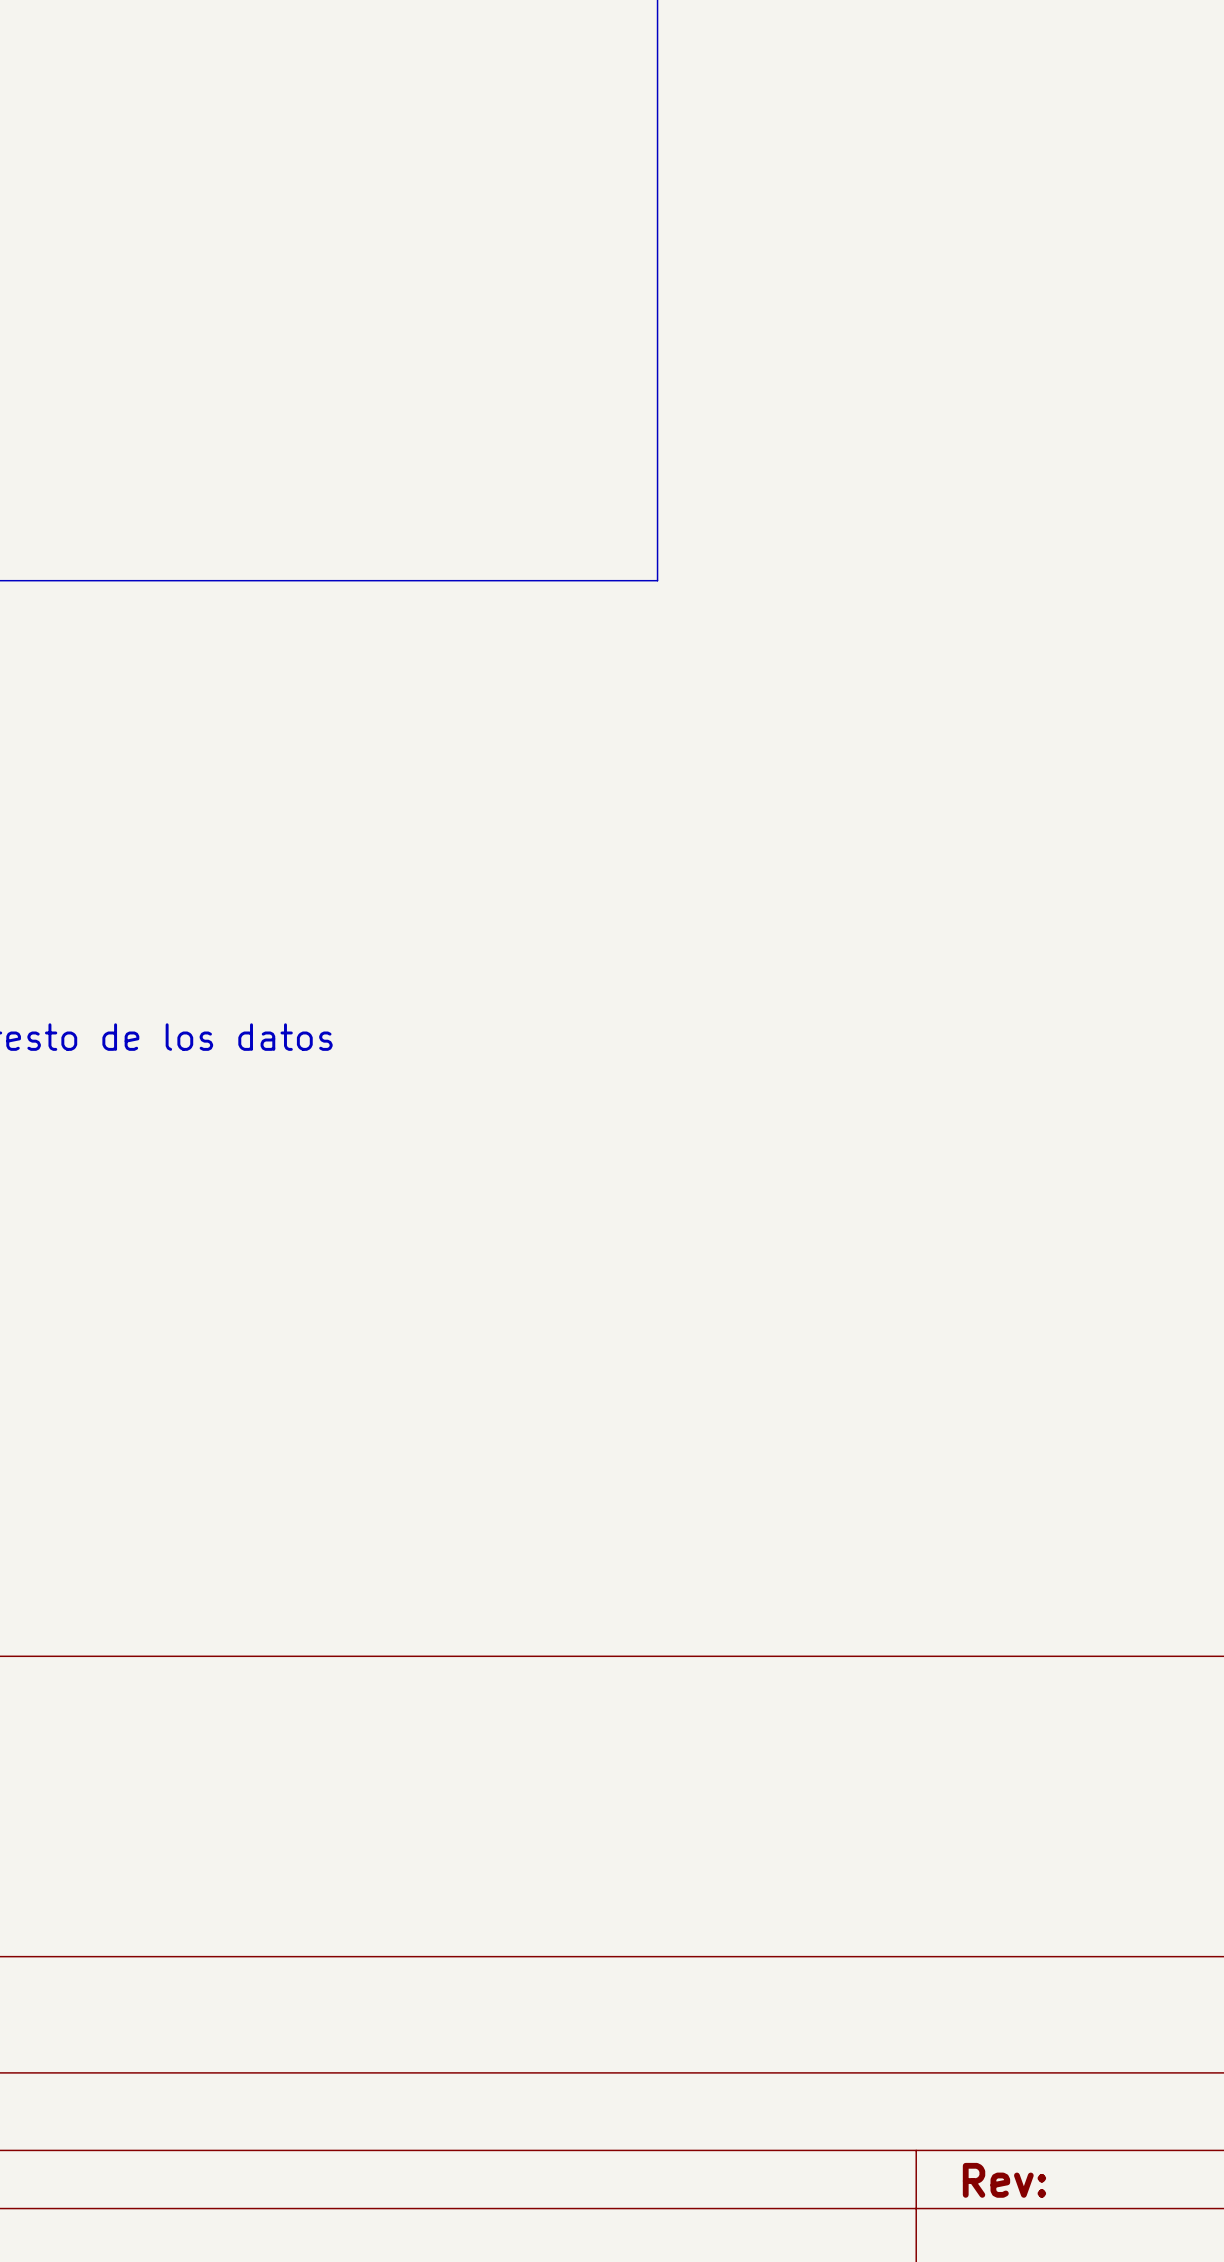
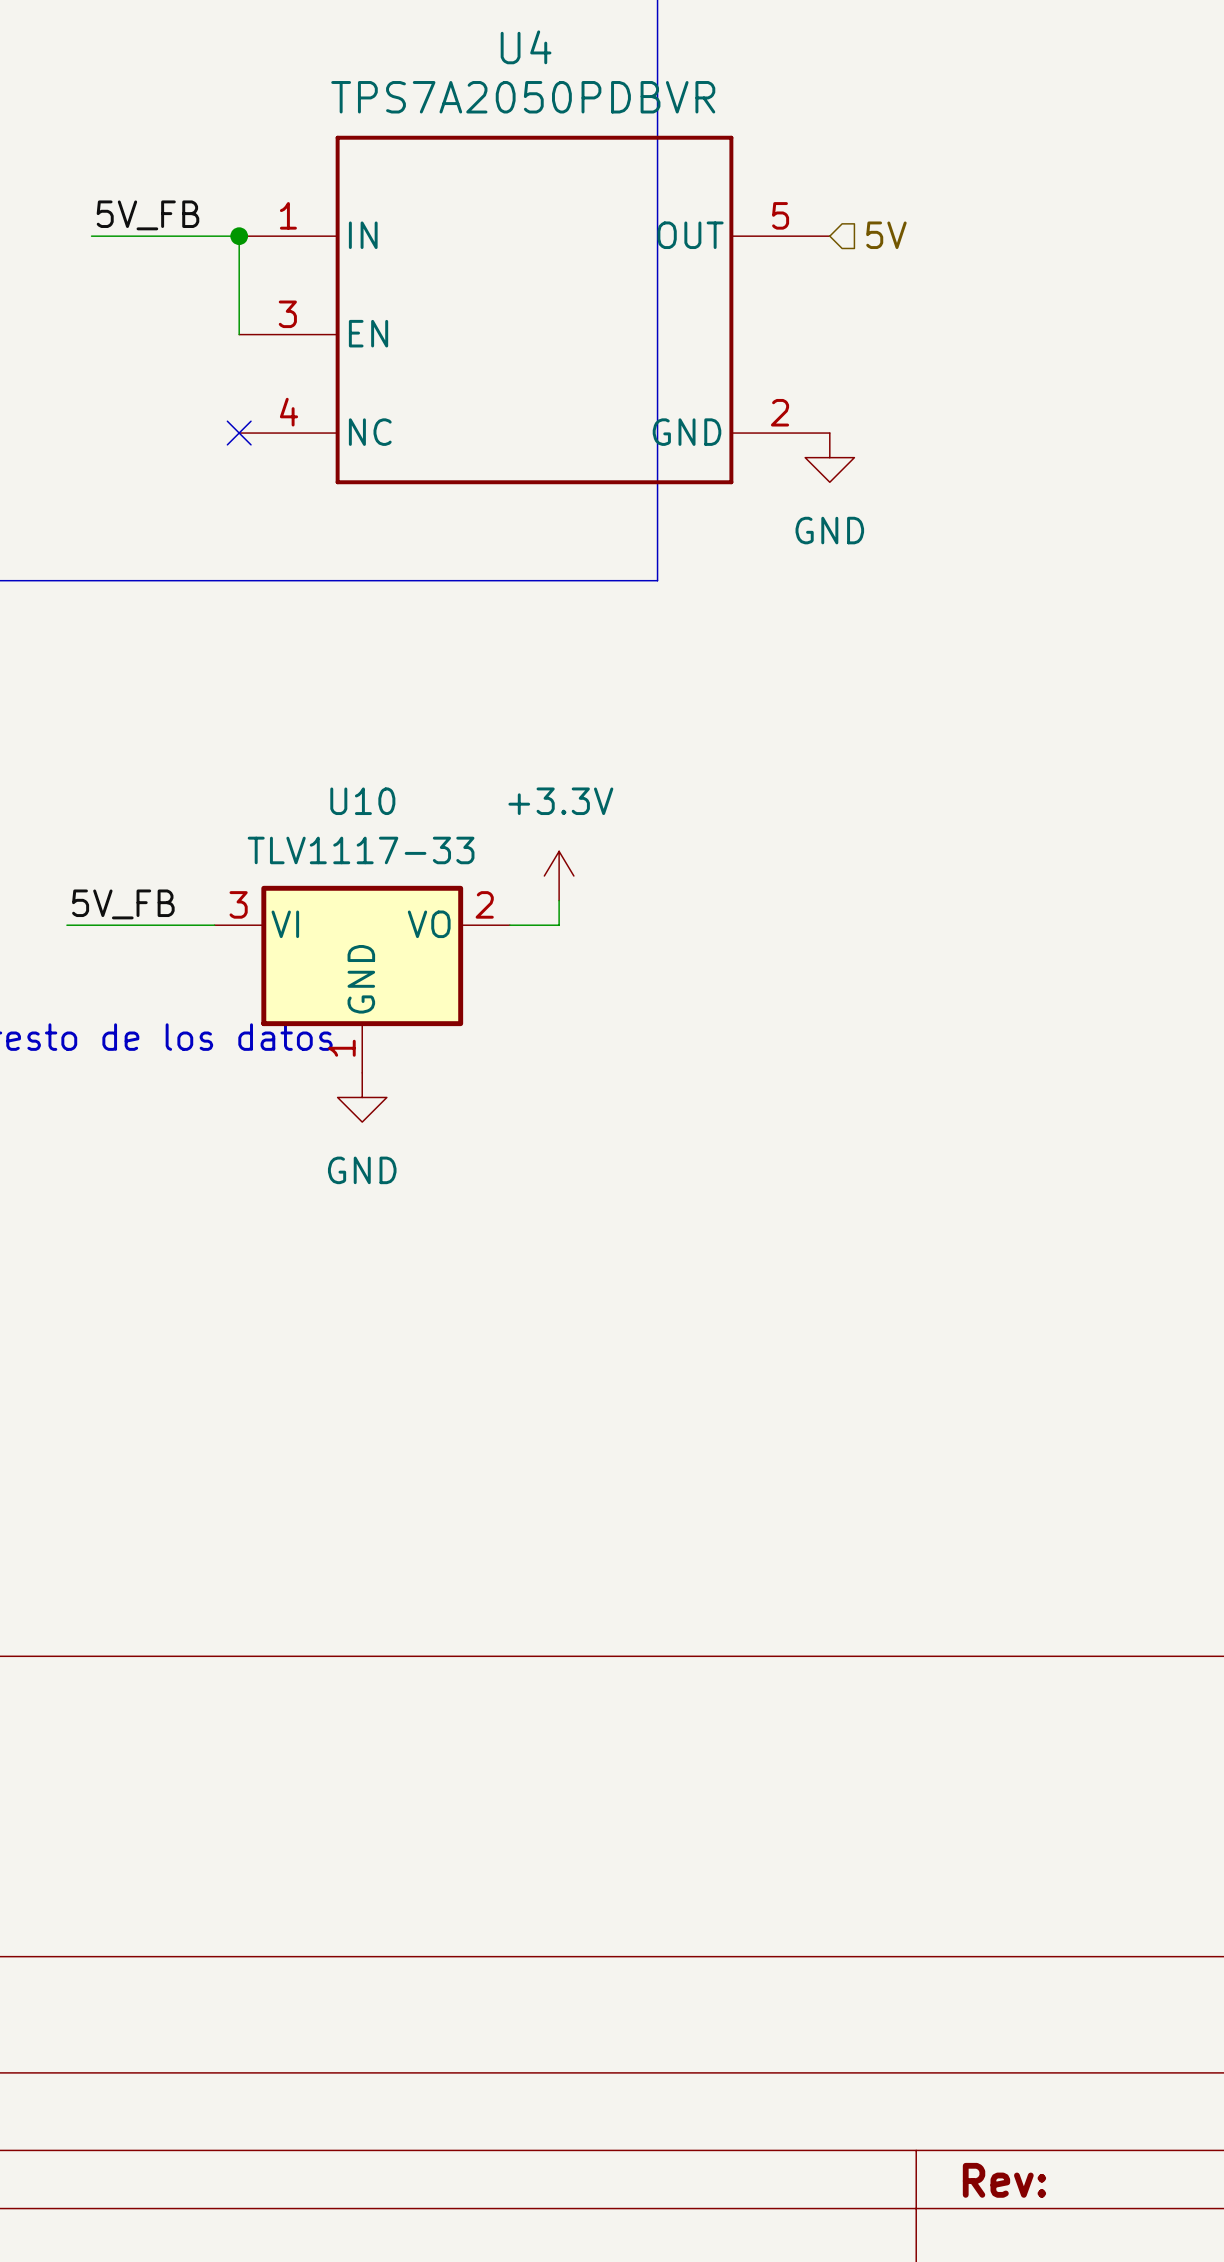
label: none -> 5V_FB (147, 215)
hierarchical label: none -> 5V (886, 235)
wire: none -> (91, 236) (239, 236) (239, 334)
junction: none -> (239, 236)
U4: none -> TPS7A2050PDBVR (534, 309)
no-connect mark: none -> (239, 433)
power symbol: none -> GND (829, 457)
power symbol: none -> +3.3V (559, 875)
wire: none -> (559, 900) (559, 925) (509, 925)
label: none -> 5V_FB (123, 904)
wire: none -> (66, 925) (214, 925)
U10: none -> TLV1117-33 (362, 979)
power symbol: none -> GND (362, 1097)

